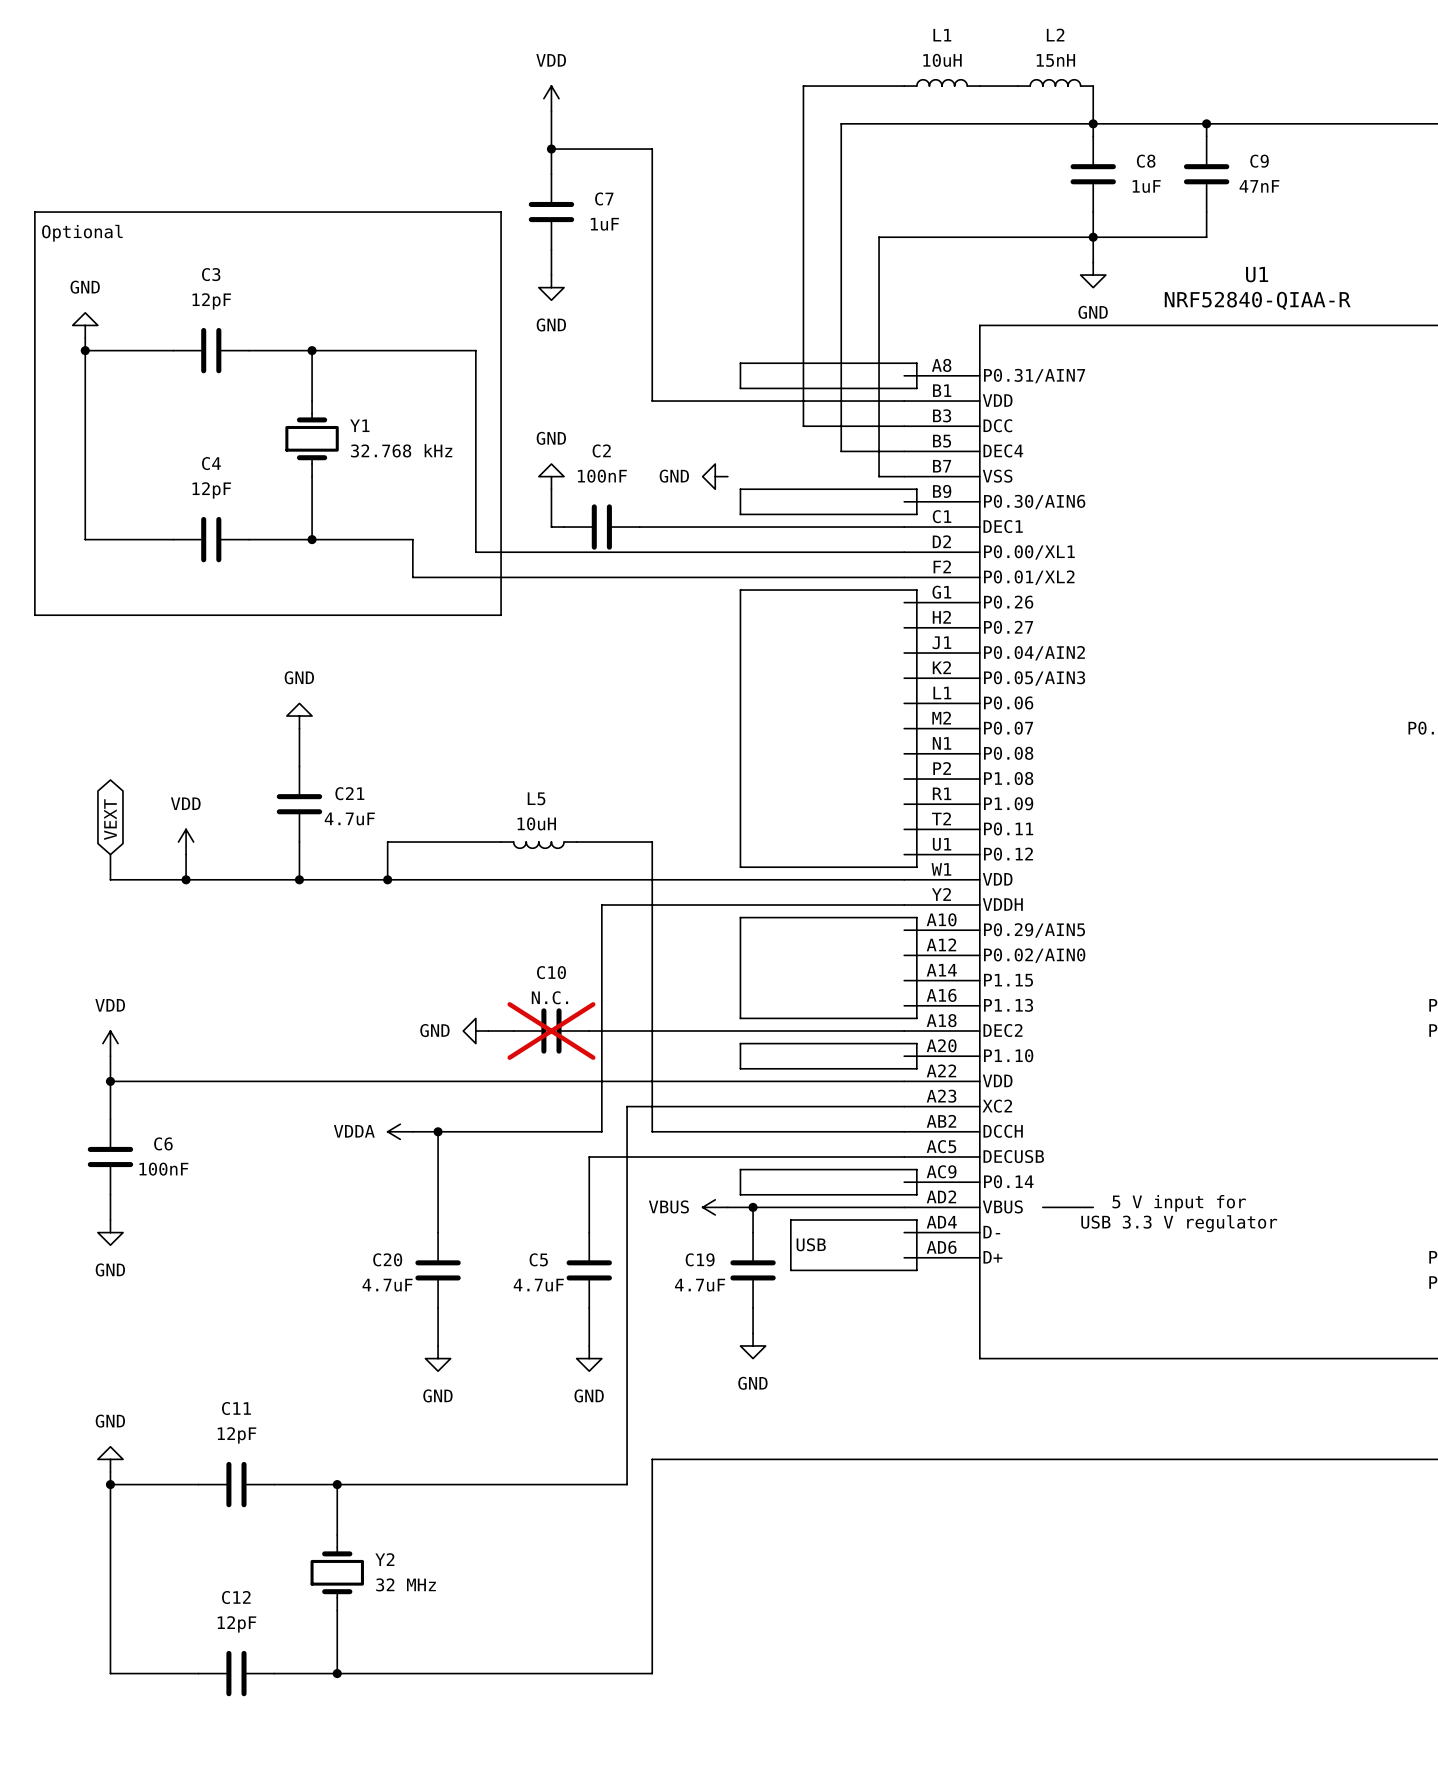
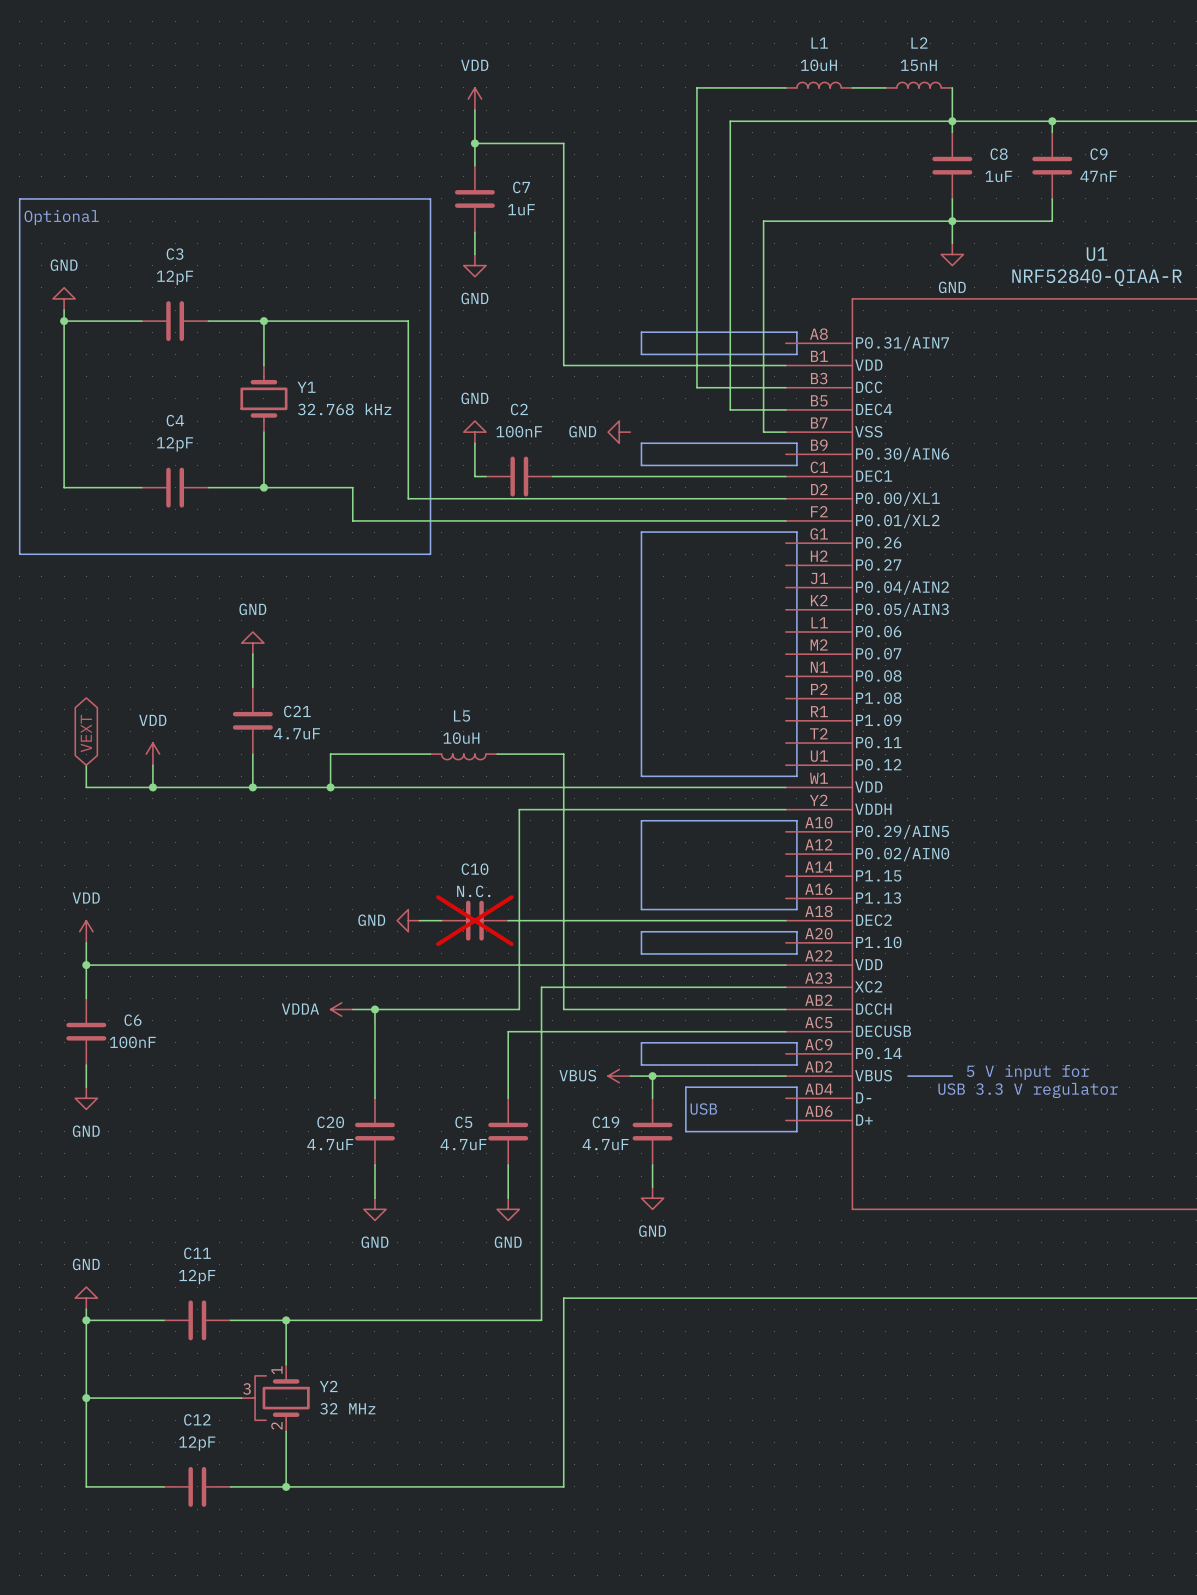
Y2 symbol: [310, 1534, 364, 1611] -> [241, 1364, 310, 1432]
wire: none -> (86, 1398) (241, 1398)
junction: none -> (86, 1398)

